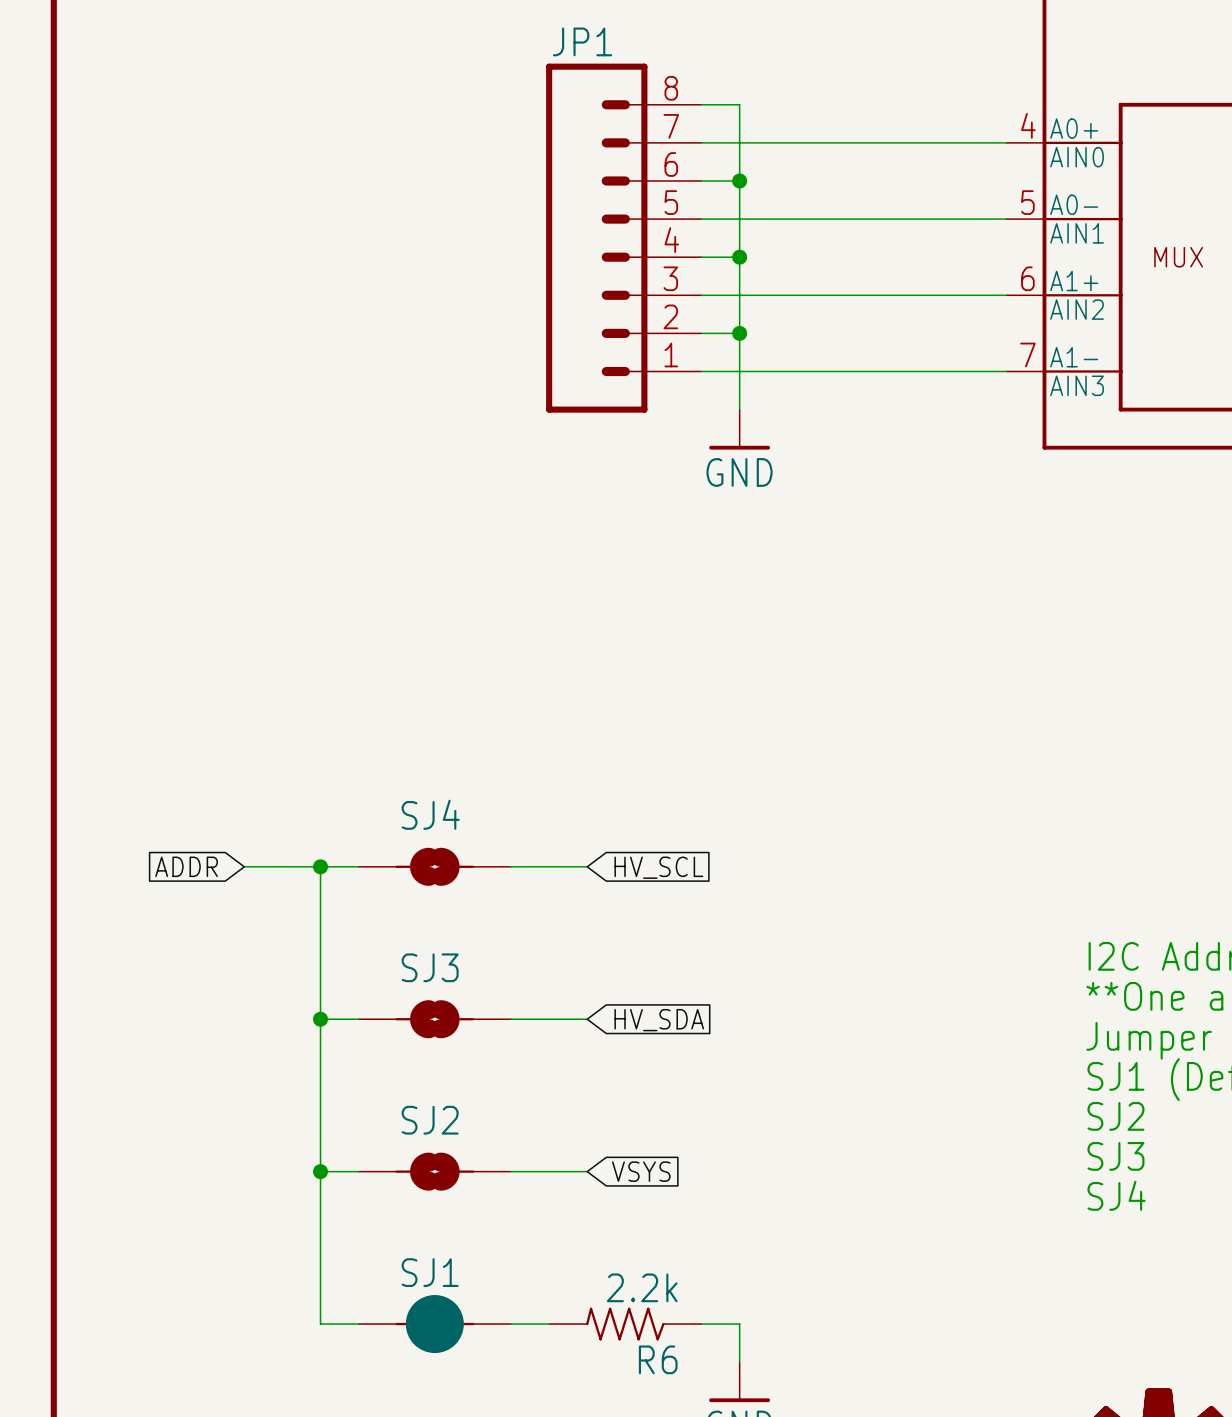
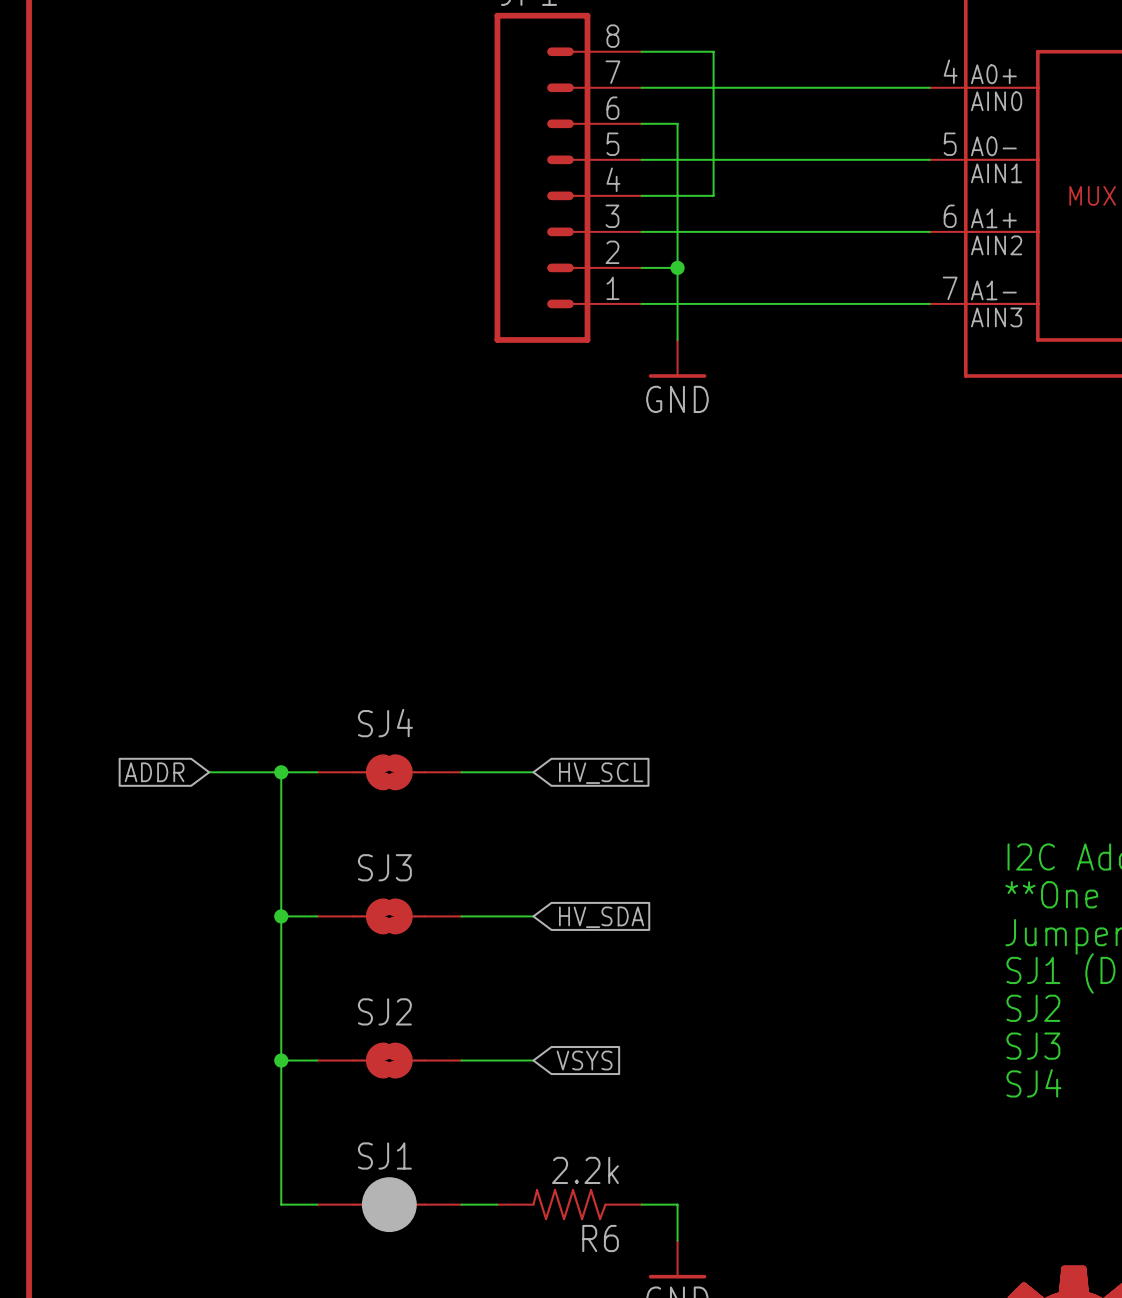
wire: (739, 104) (739, 180) -> (677, 51) (713, 51) (713, 195) (677, 195)
junction: (739, 180) -> none
junction: (739, 257) -> none

